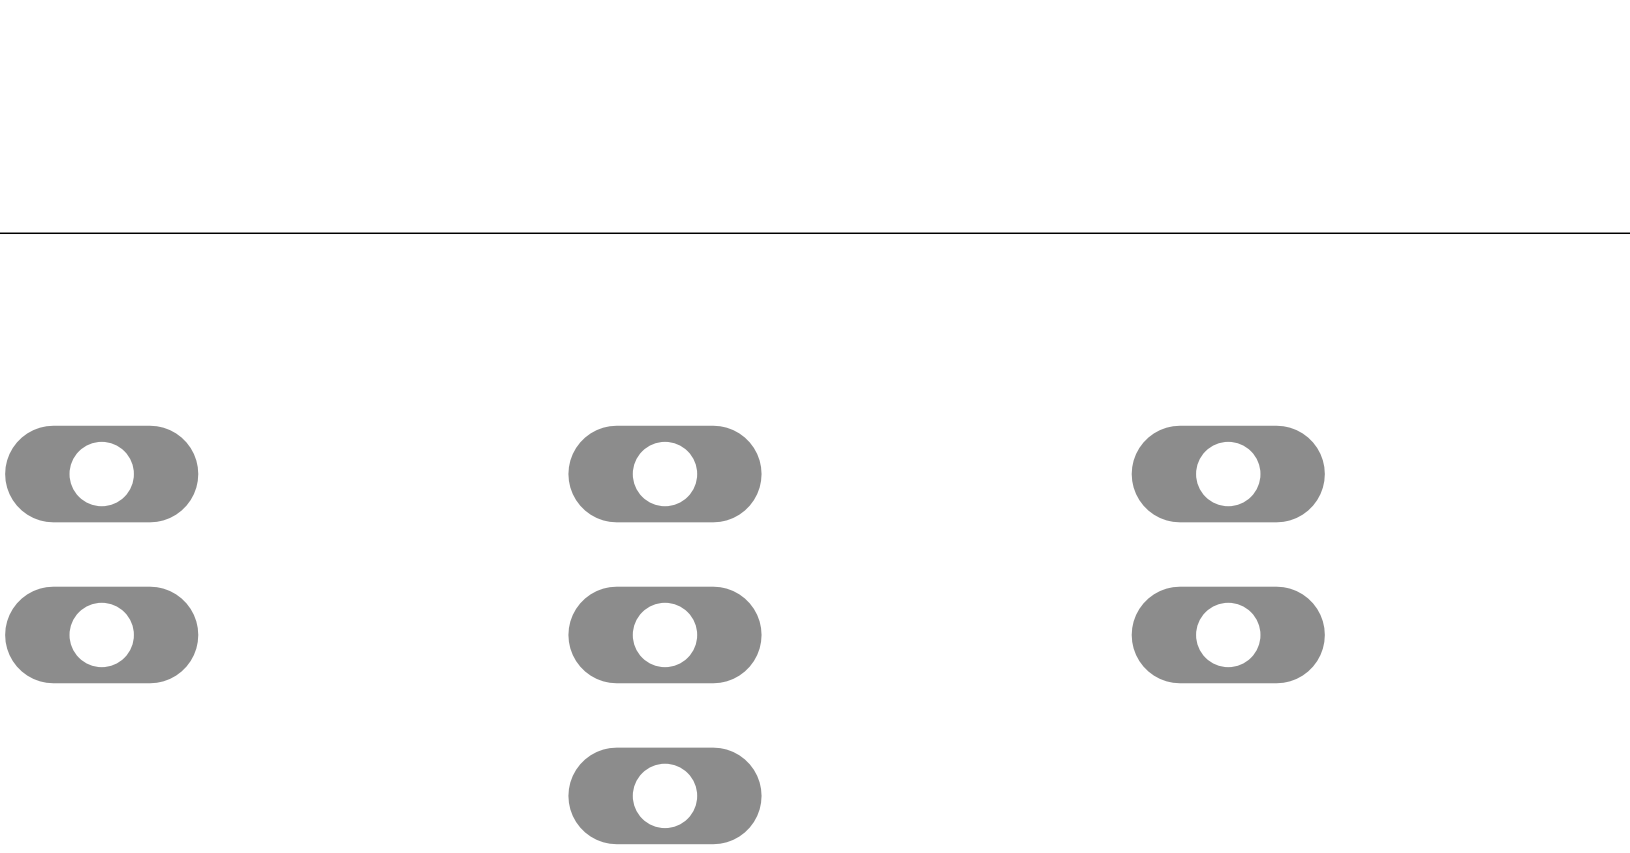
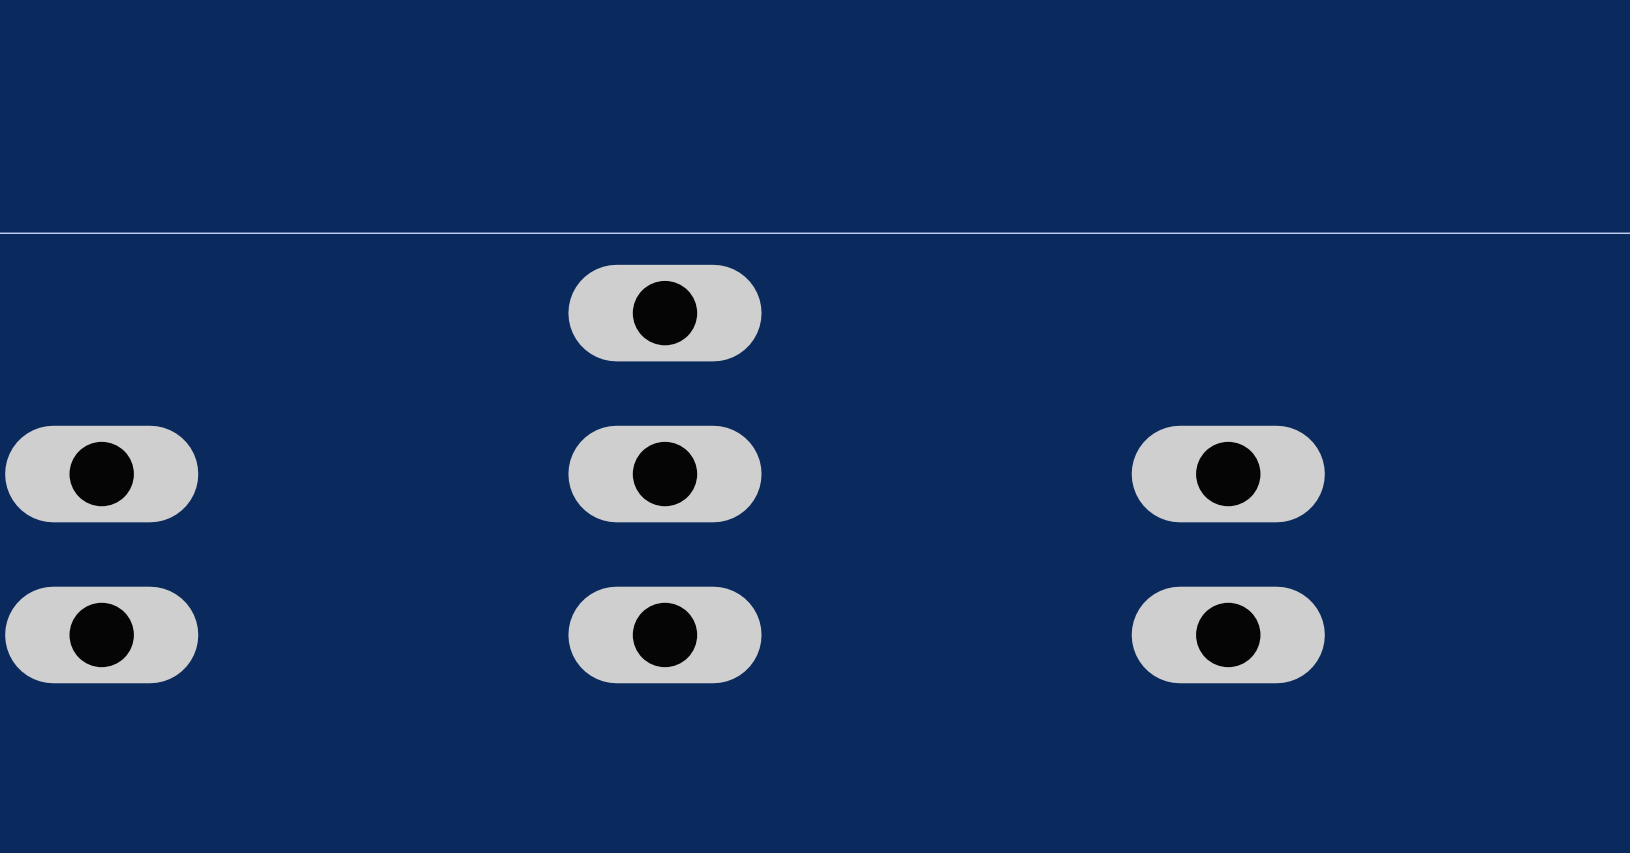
part position: (664, 634) -> (664, 474)

